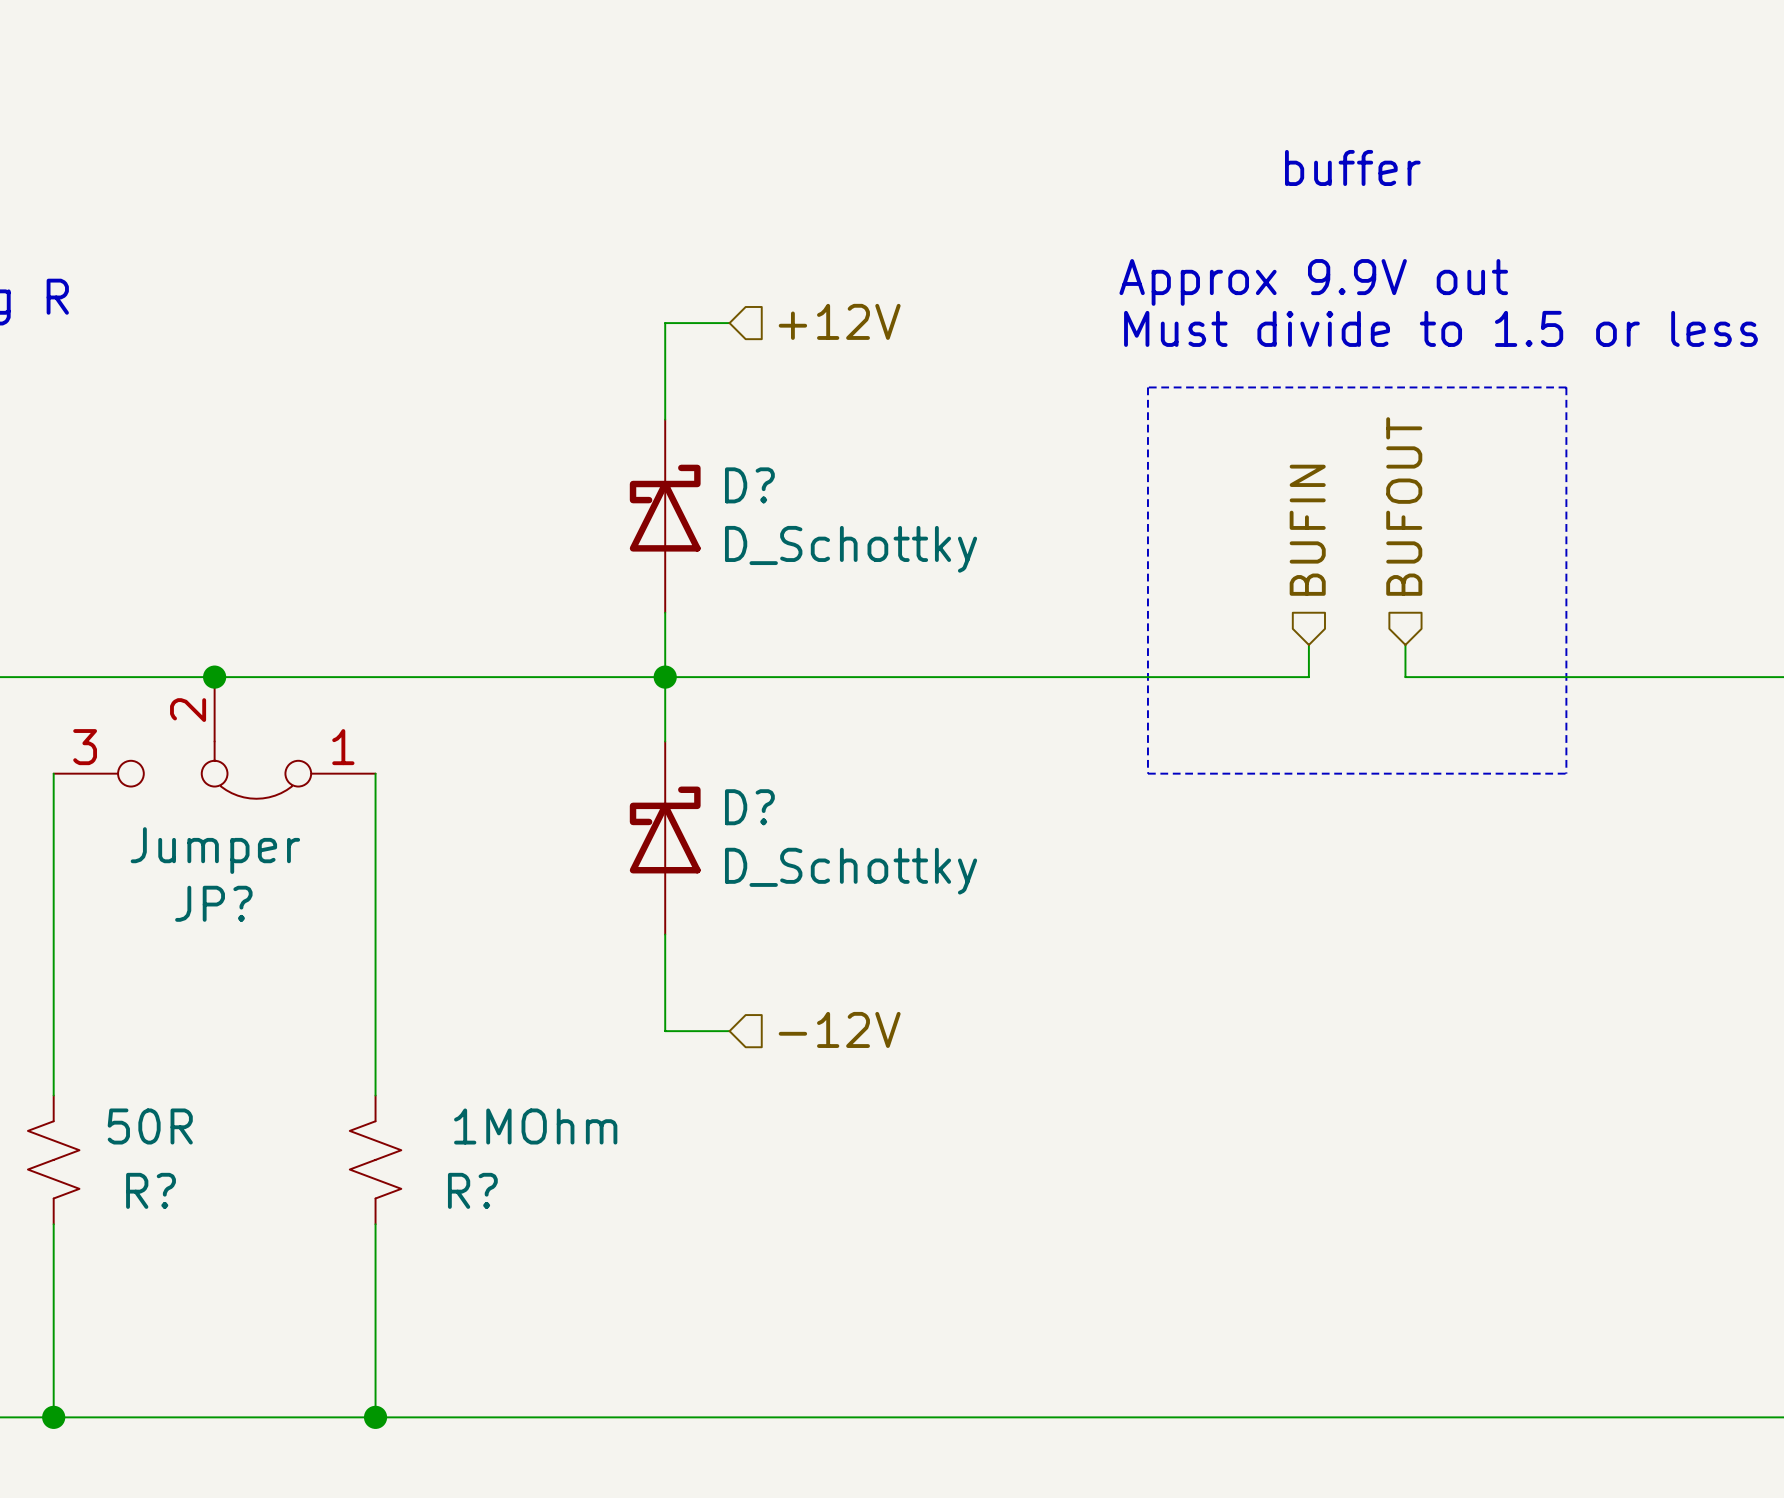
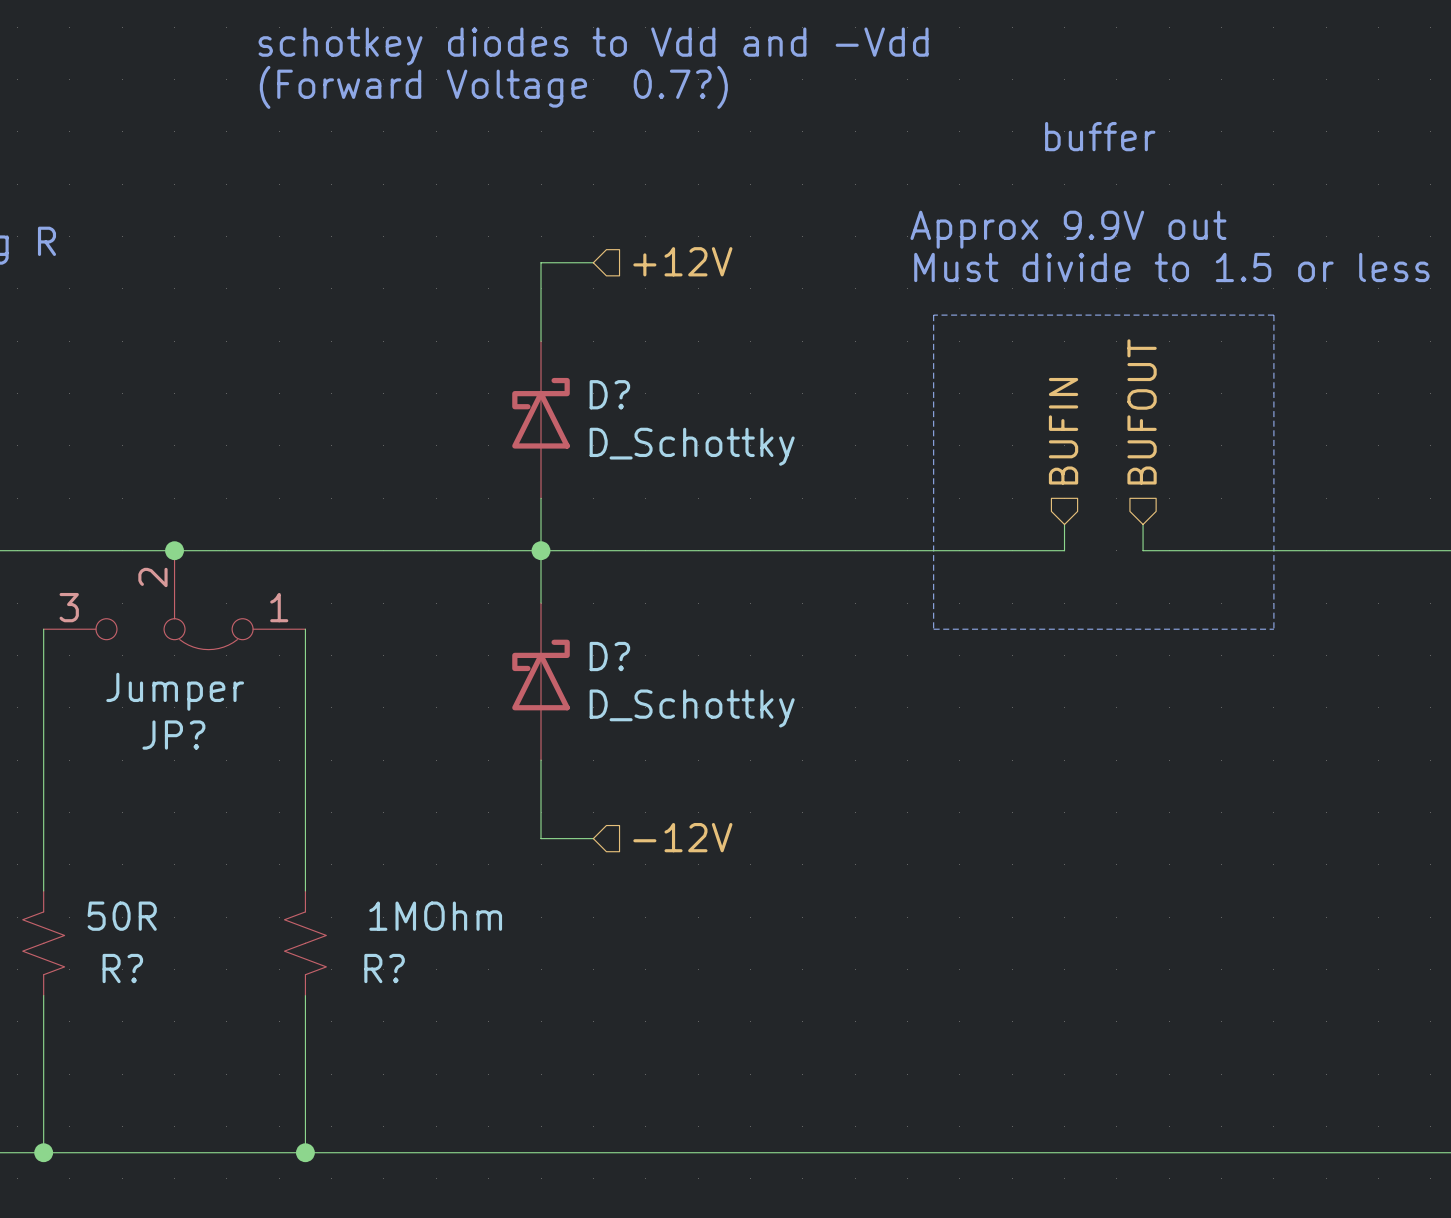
text: none -> schotkey diodes to Vdd and -Vdd (593, 46)
text: none -> (Forward Voltage 0.7?) (493, 87)

